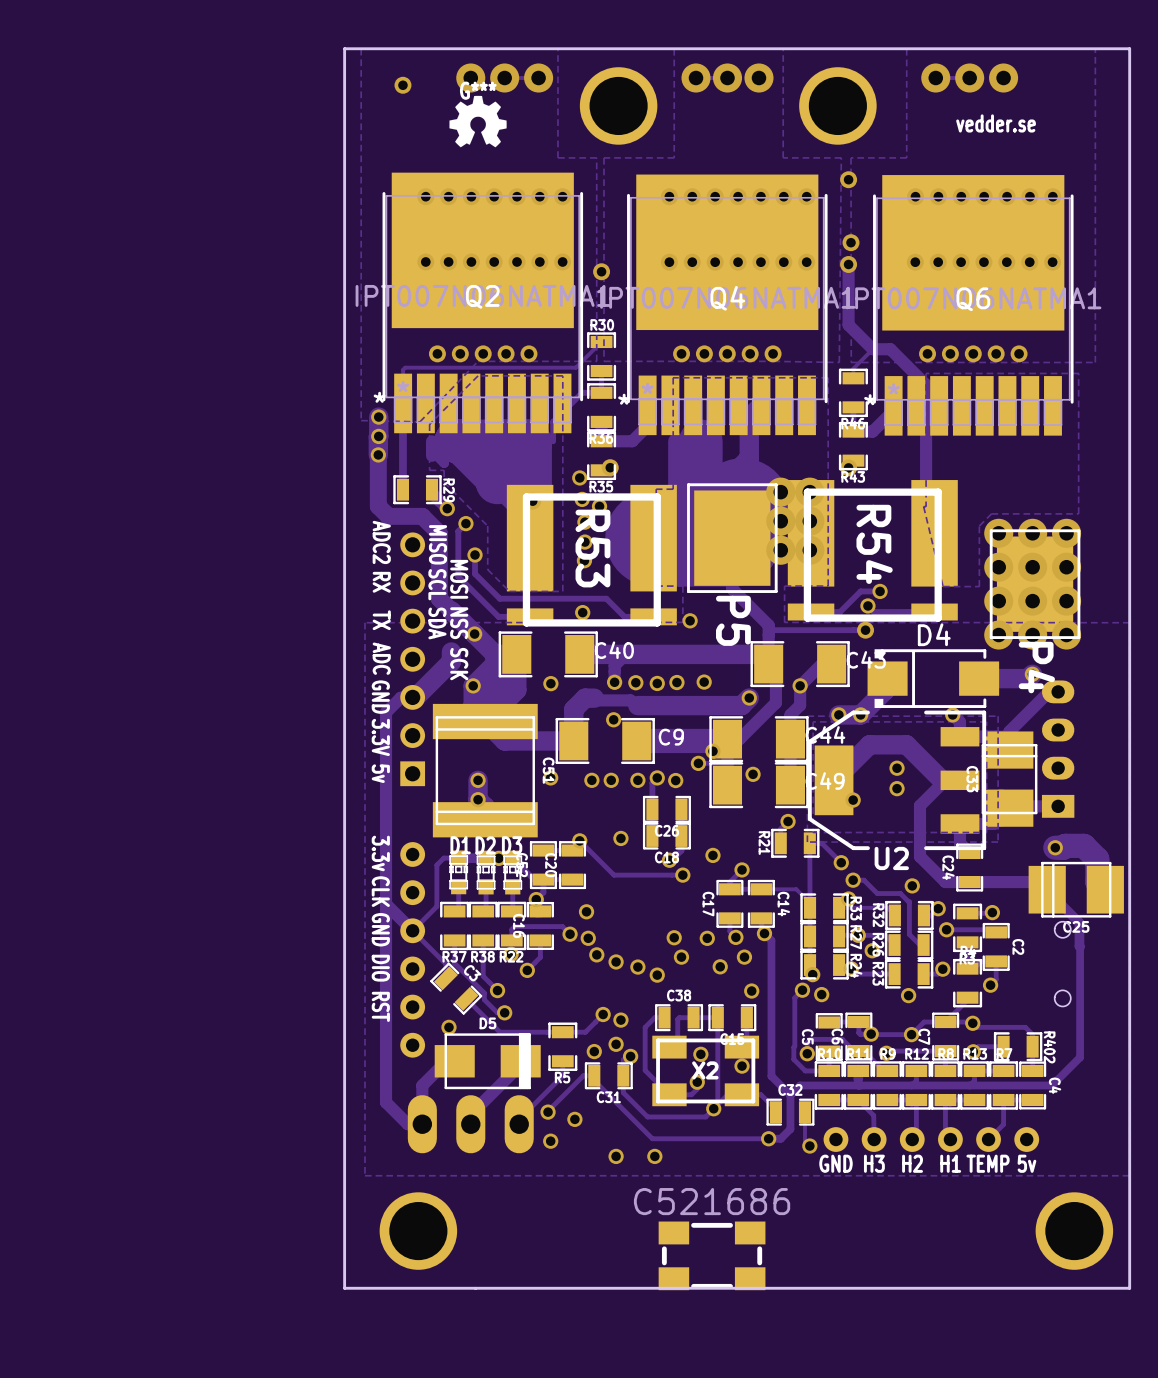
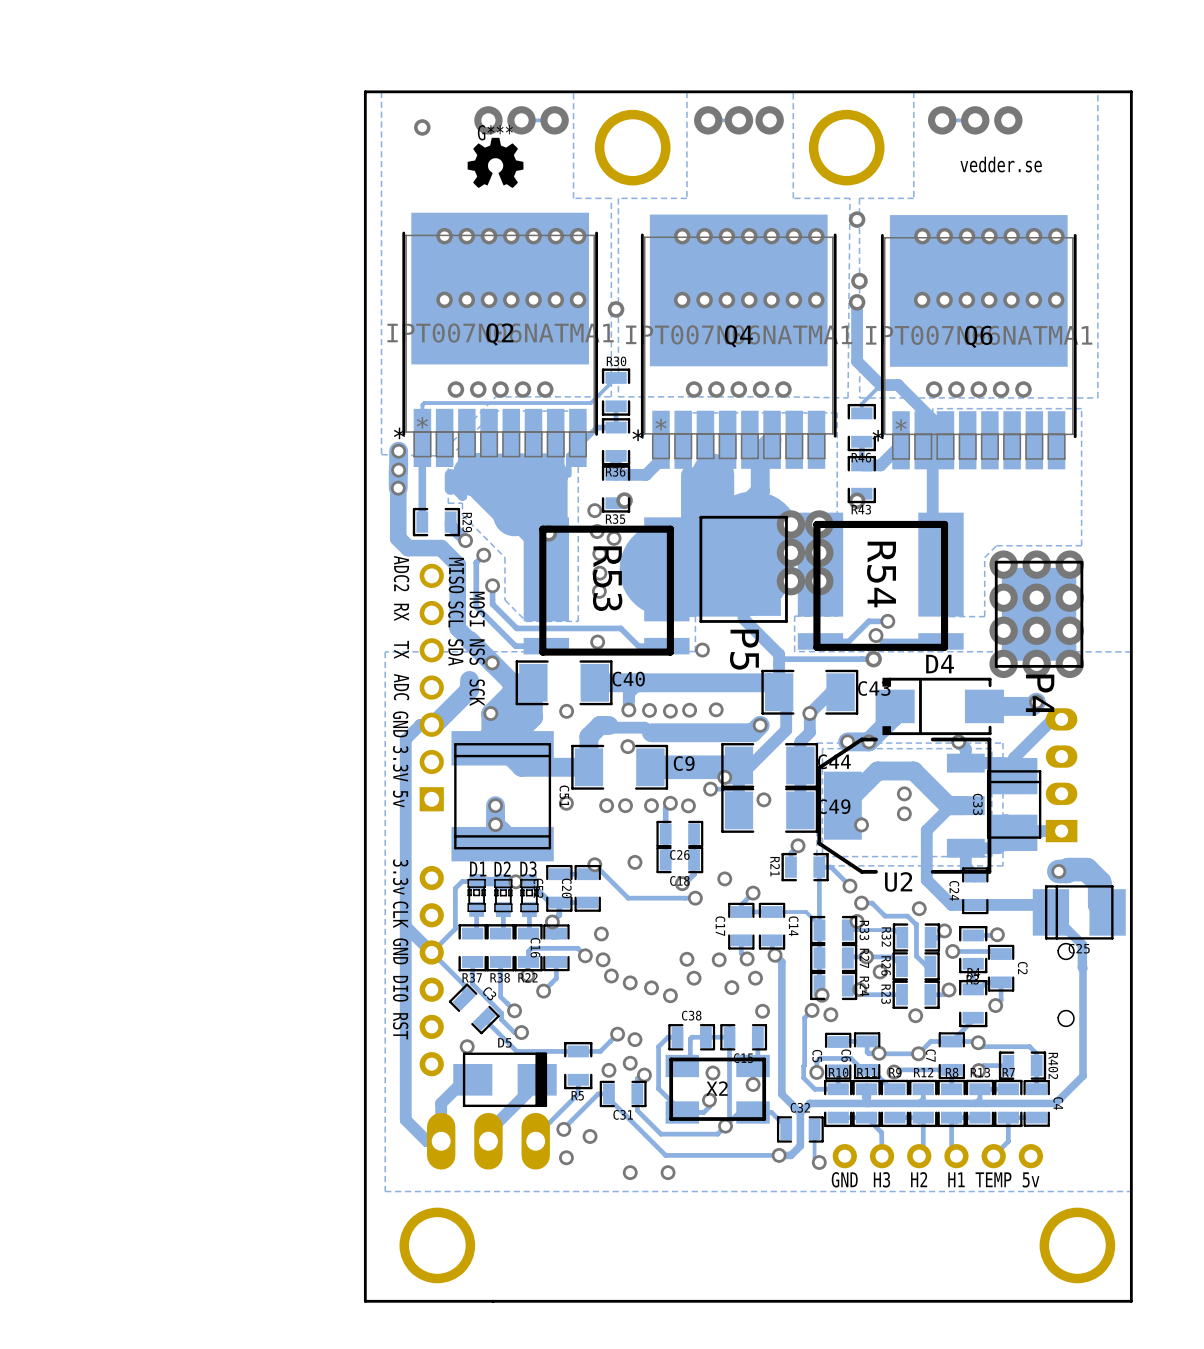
part: C521686 (712, 1255) -> none

